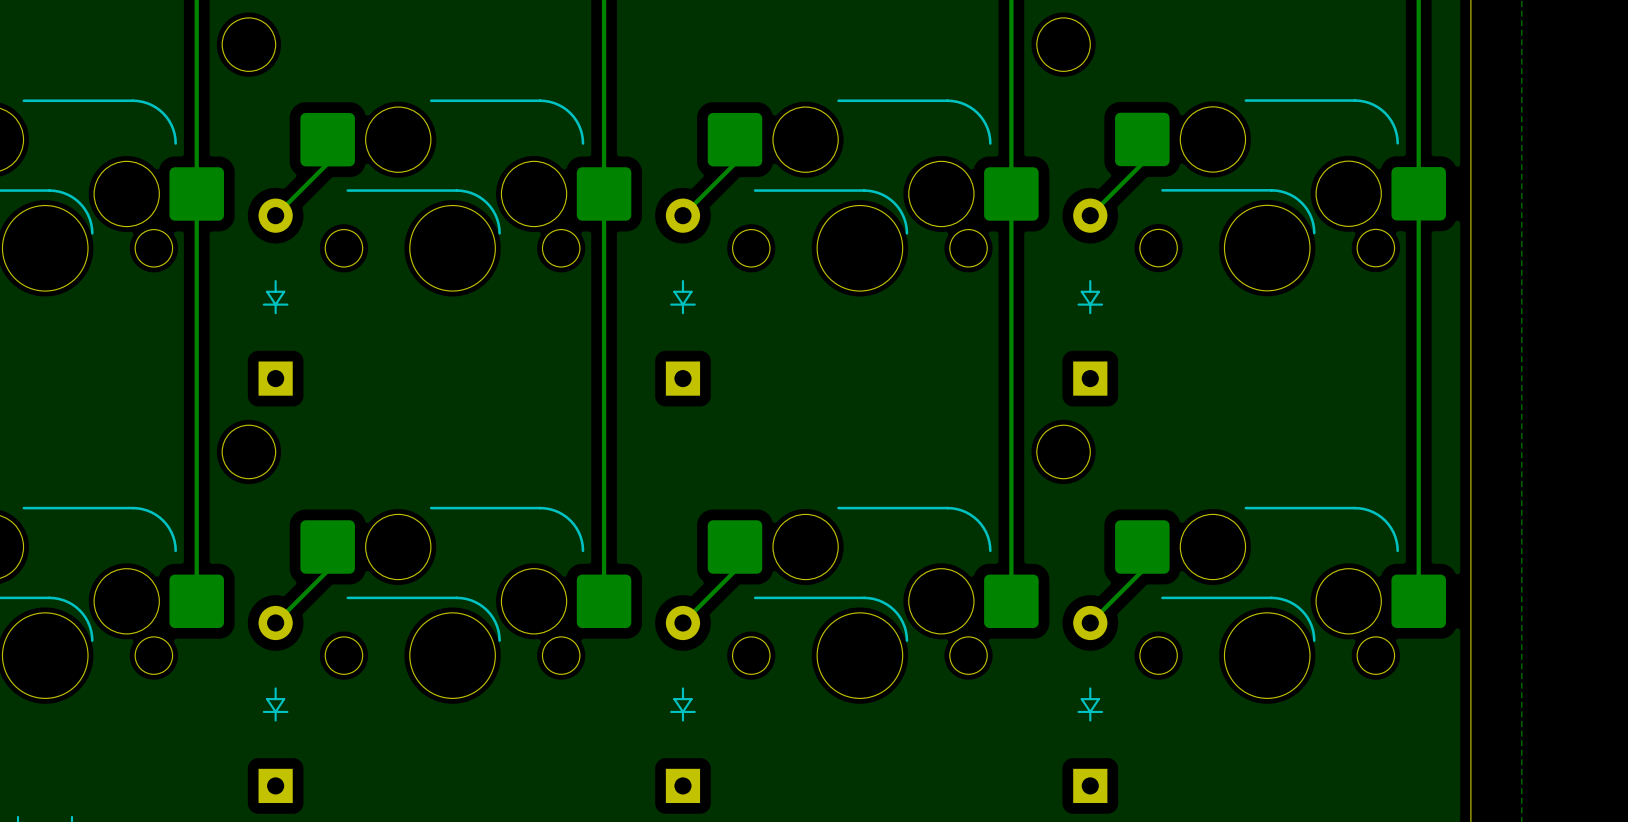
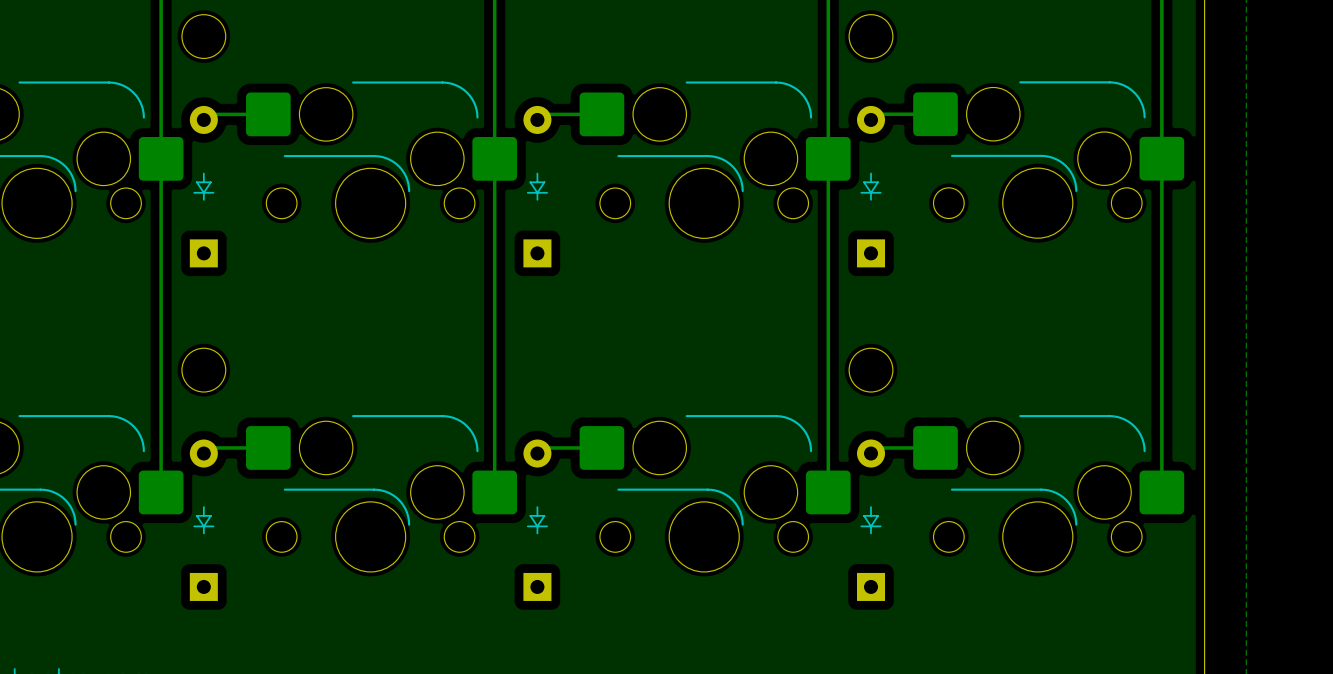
track: (327, 139) (327, 163) (275, 215) -> (268, 114) (209, 114) (203, 119)
track: (734, 139) (734, 163) (682, 215) -> (601, 114) (542, 114) (537, 119)
track: (1142, 139) (1142, 163) (1090, 215) -> (935, 114) (876, 114) (871, 119)
part position: (275, 297) -> (203, 186)
part position: (682, 297) -> (537, 186)
part position: (1090, 297) -> (871, 186)
track: (327, 547) (327, 570) (275, 622) -> (268, 447) (209, 447) (203, 453)
track: (734, 547) (734, 570) (682, 622) -> (601, 447) (542, 447) (537, 453)
track: (1142, 547) (1142, 570) (1090, 622) -> (935, 447) (876, 447) (871, 453)
part position: (275, 704) -> (203, 520)
part position: (682, 704) -> (537, 520)
part position: (1090, 704) -> (871, 520)

